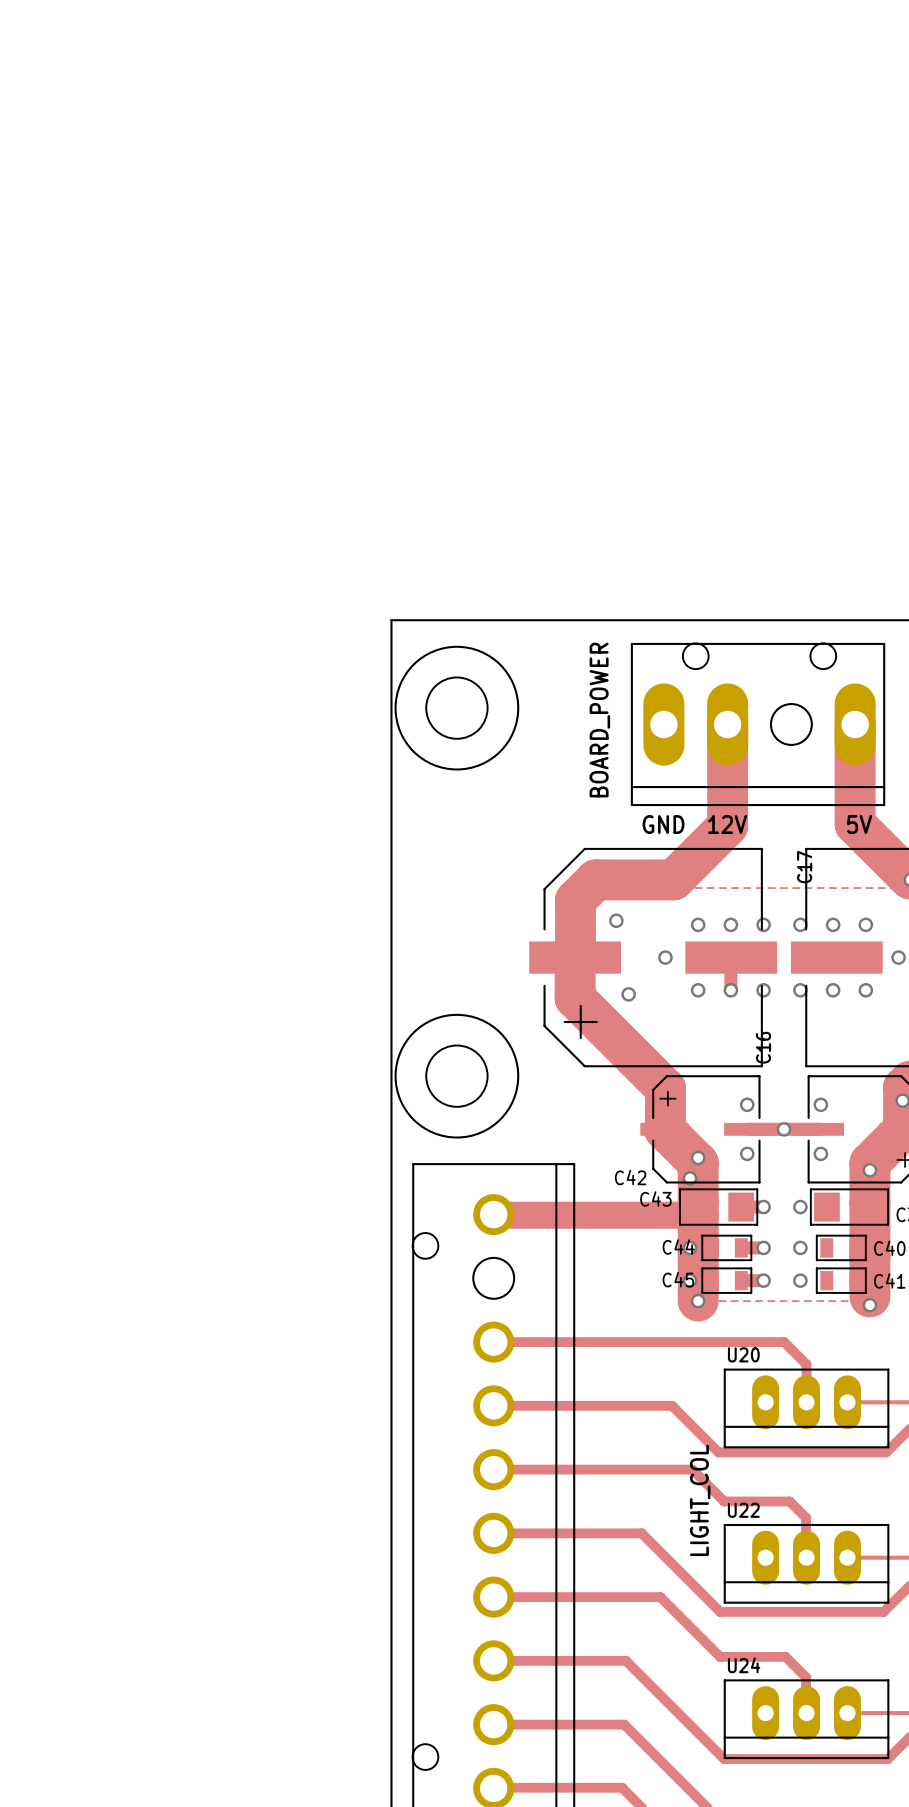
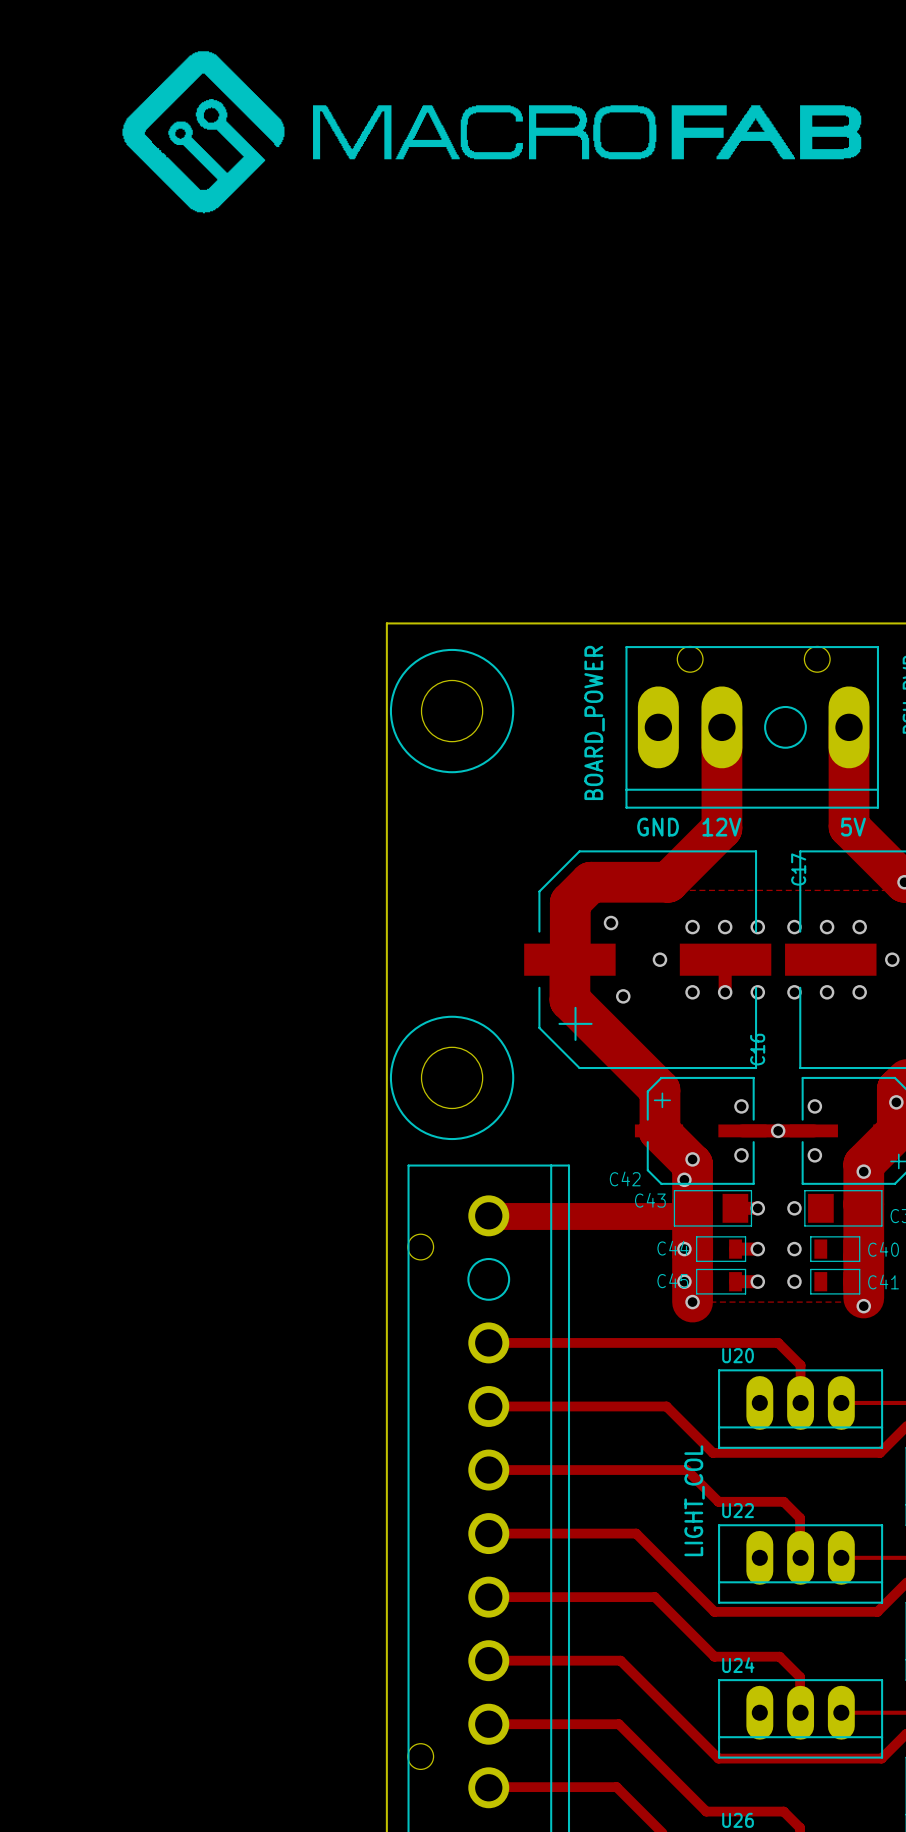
drawing: none -> [122, 51, 862, 214]

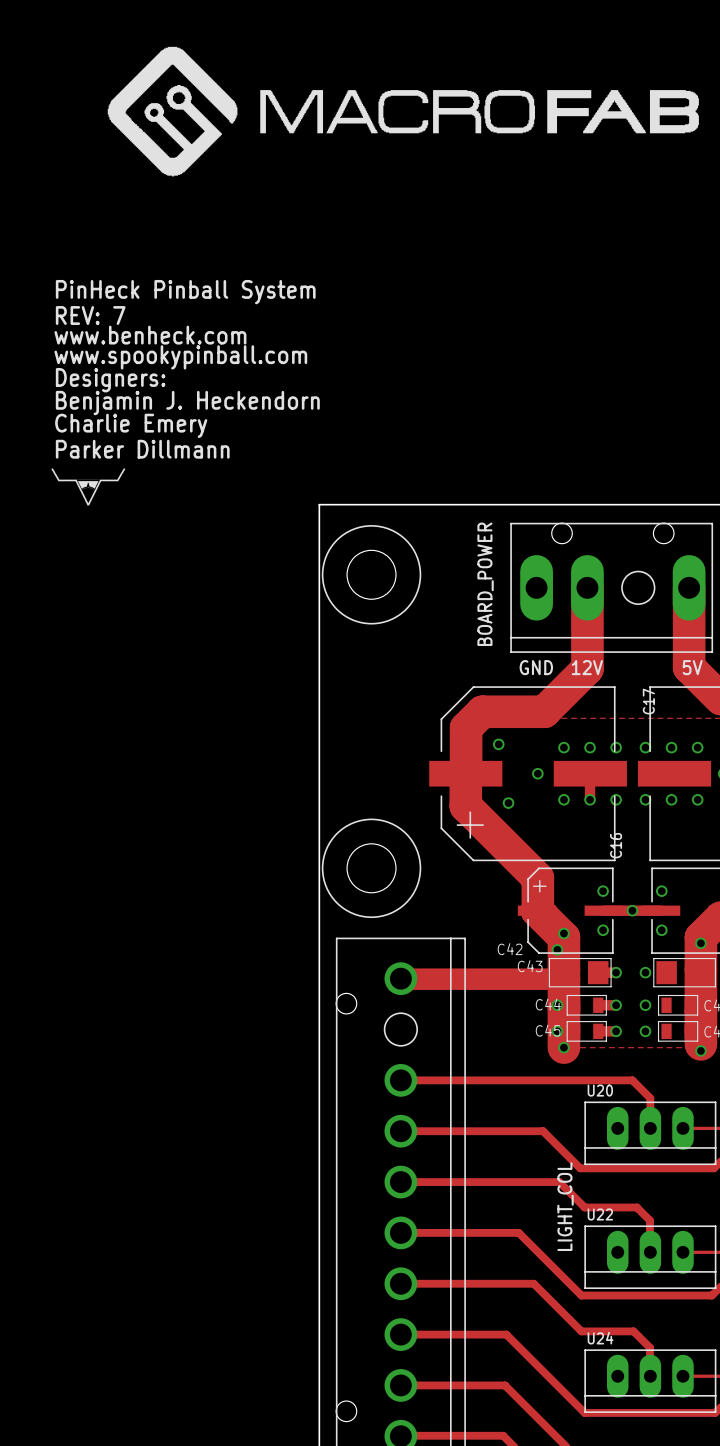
text: none -> PinHeck Pinball System (185, 292)
text: none -> REV: 7 (90, 315)
text: none -> www.benheck.com (150, 335)
text: none -> www.spookypinball.com (180, 357)
text: none -> Designers: (110, 380)
text: none -> Benjamin J. Heckendorn (187, 403)
text: none -> Charlie Emery (131, 425)
text: none -> Parker Dillmann (142, 449)
drawing: none -> [51, 468, 126, 506]

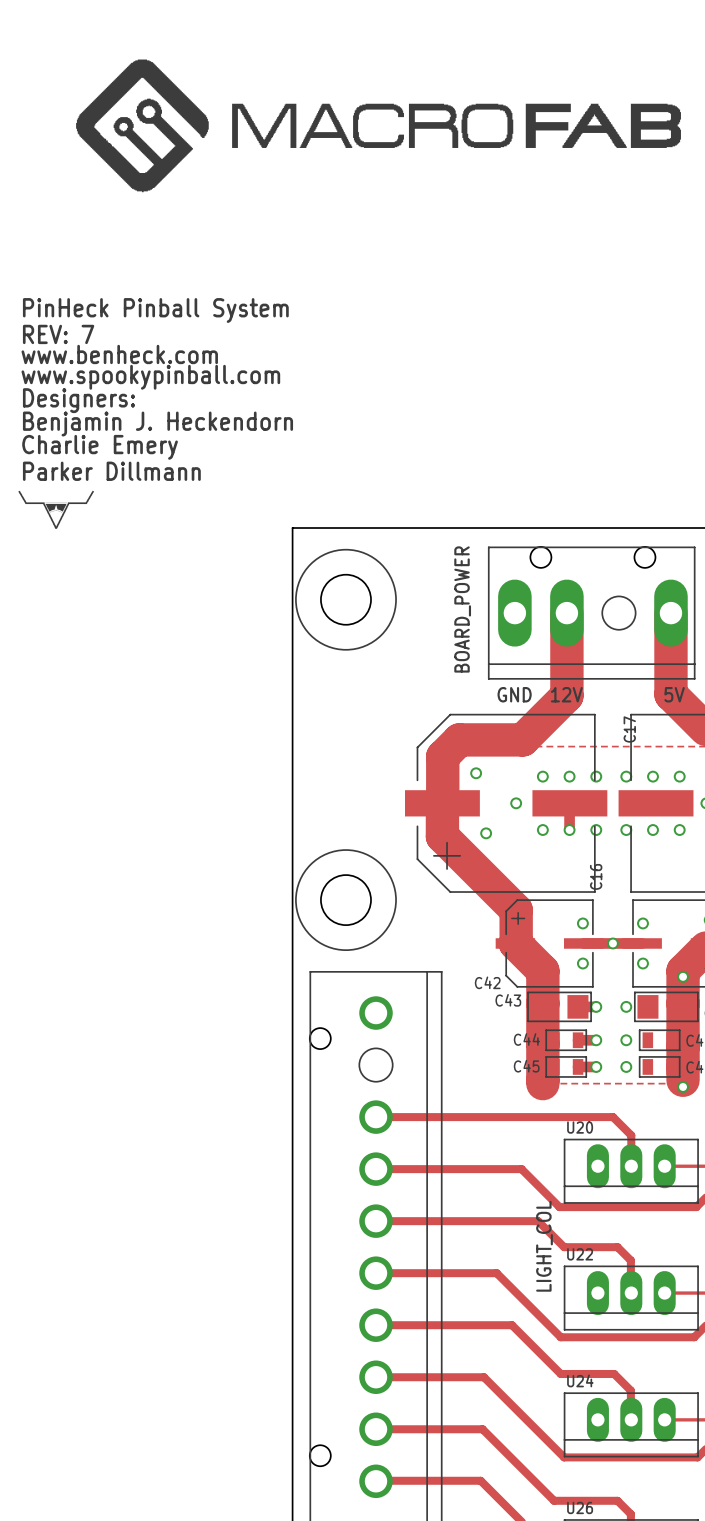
via: (563, 933) -> none
via: (557, 949) -> none
track: (400, 978) (563, 979) -> none
via: (557, 1005) -> none
via: (557, 1031) -> none
via: (563, 1047) -> none

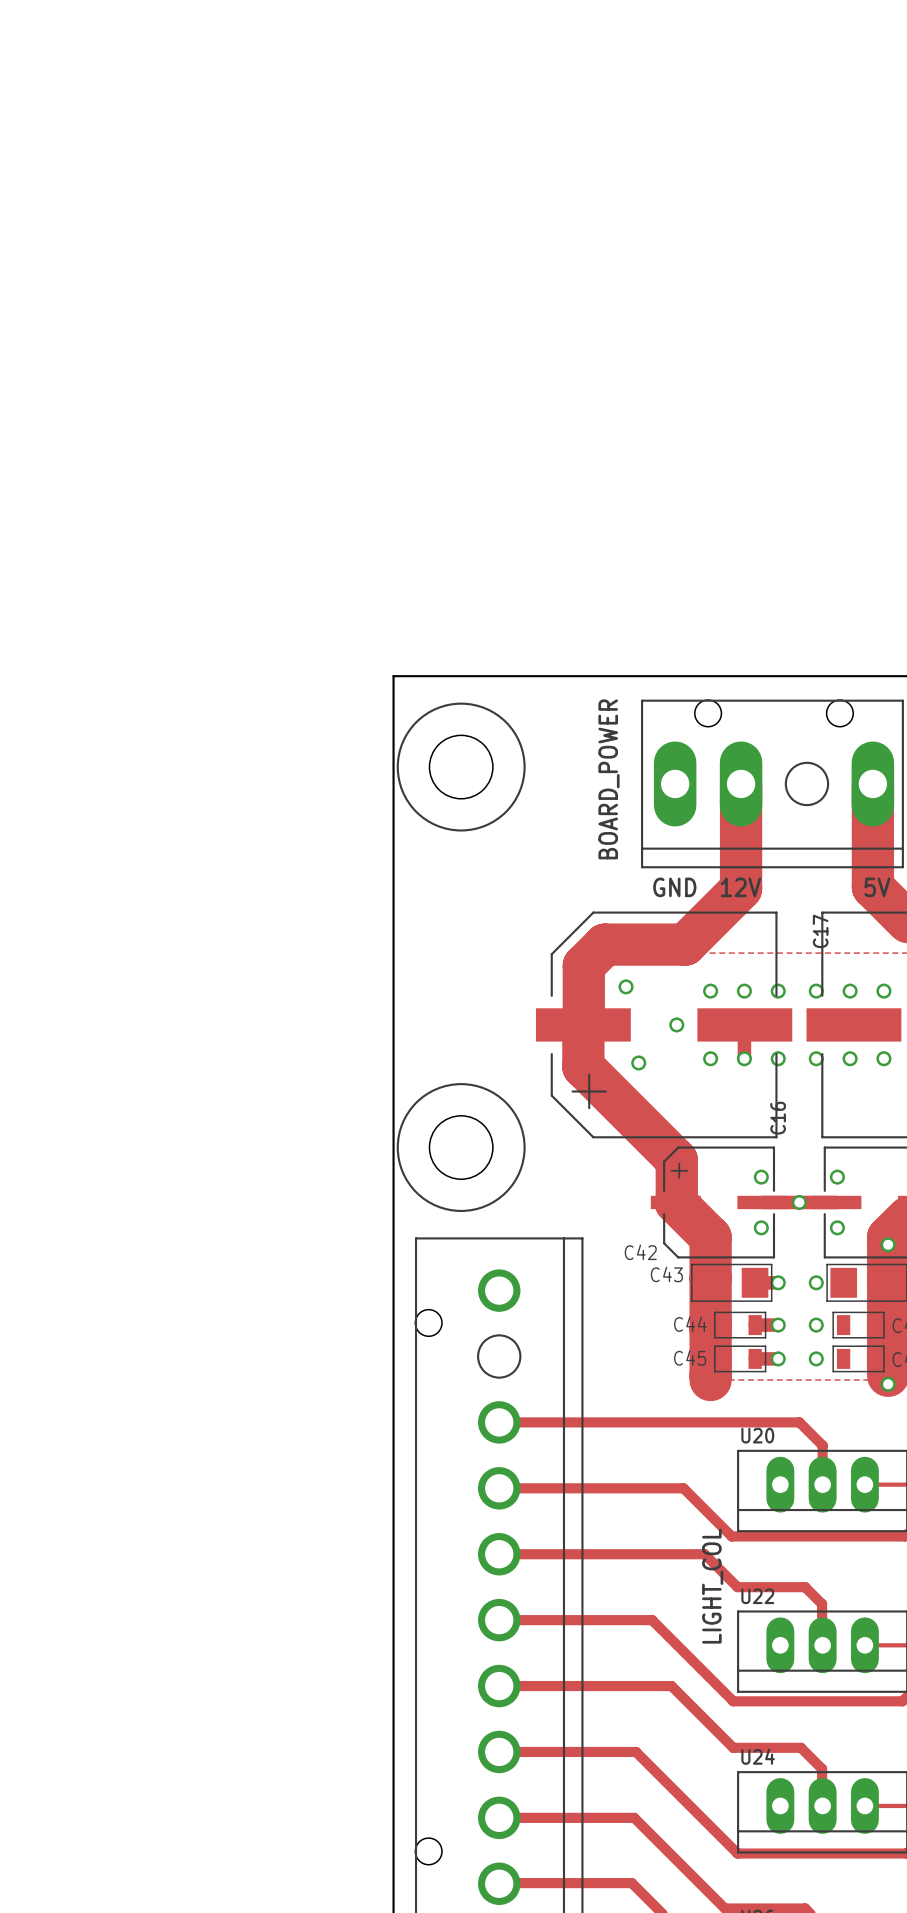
drawing: [76, 59, 681, 193] -> none
text: PinHeck Pinball System (155, 310) -> none
text: REV: 7 (58, 334) -> none
text: www.benheck.com (119, 354) -> none
text: www.spookypinball.com (150, 377) -> none
text: Designers: (78, 400) -> none
text: Benjamin J. Heckendorn (157, 423) -> none
text: Charlie Emery (100, 447) -> none
text: Parker Dillmann (111, 471) -> none
drawing: [18, 490, 95, 529] -> none

